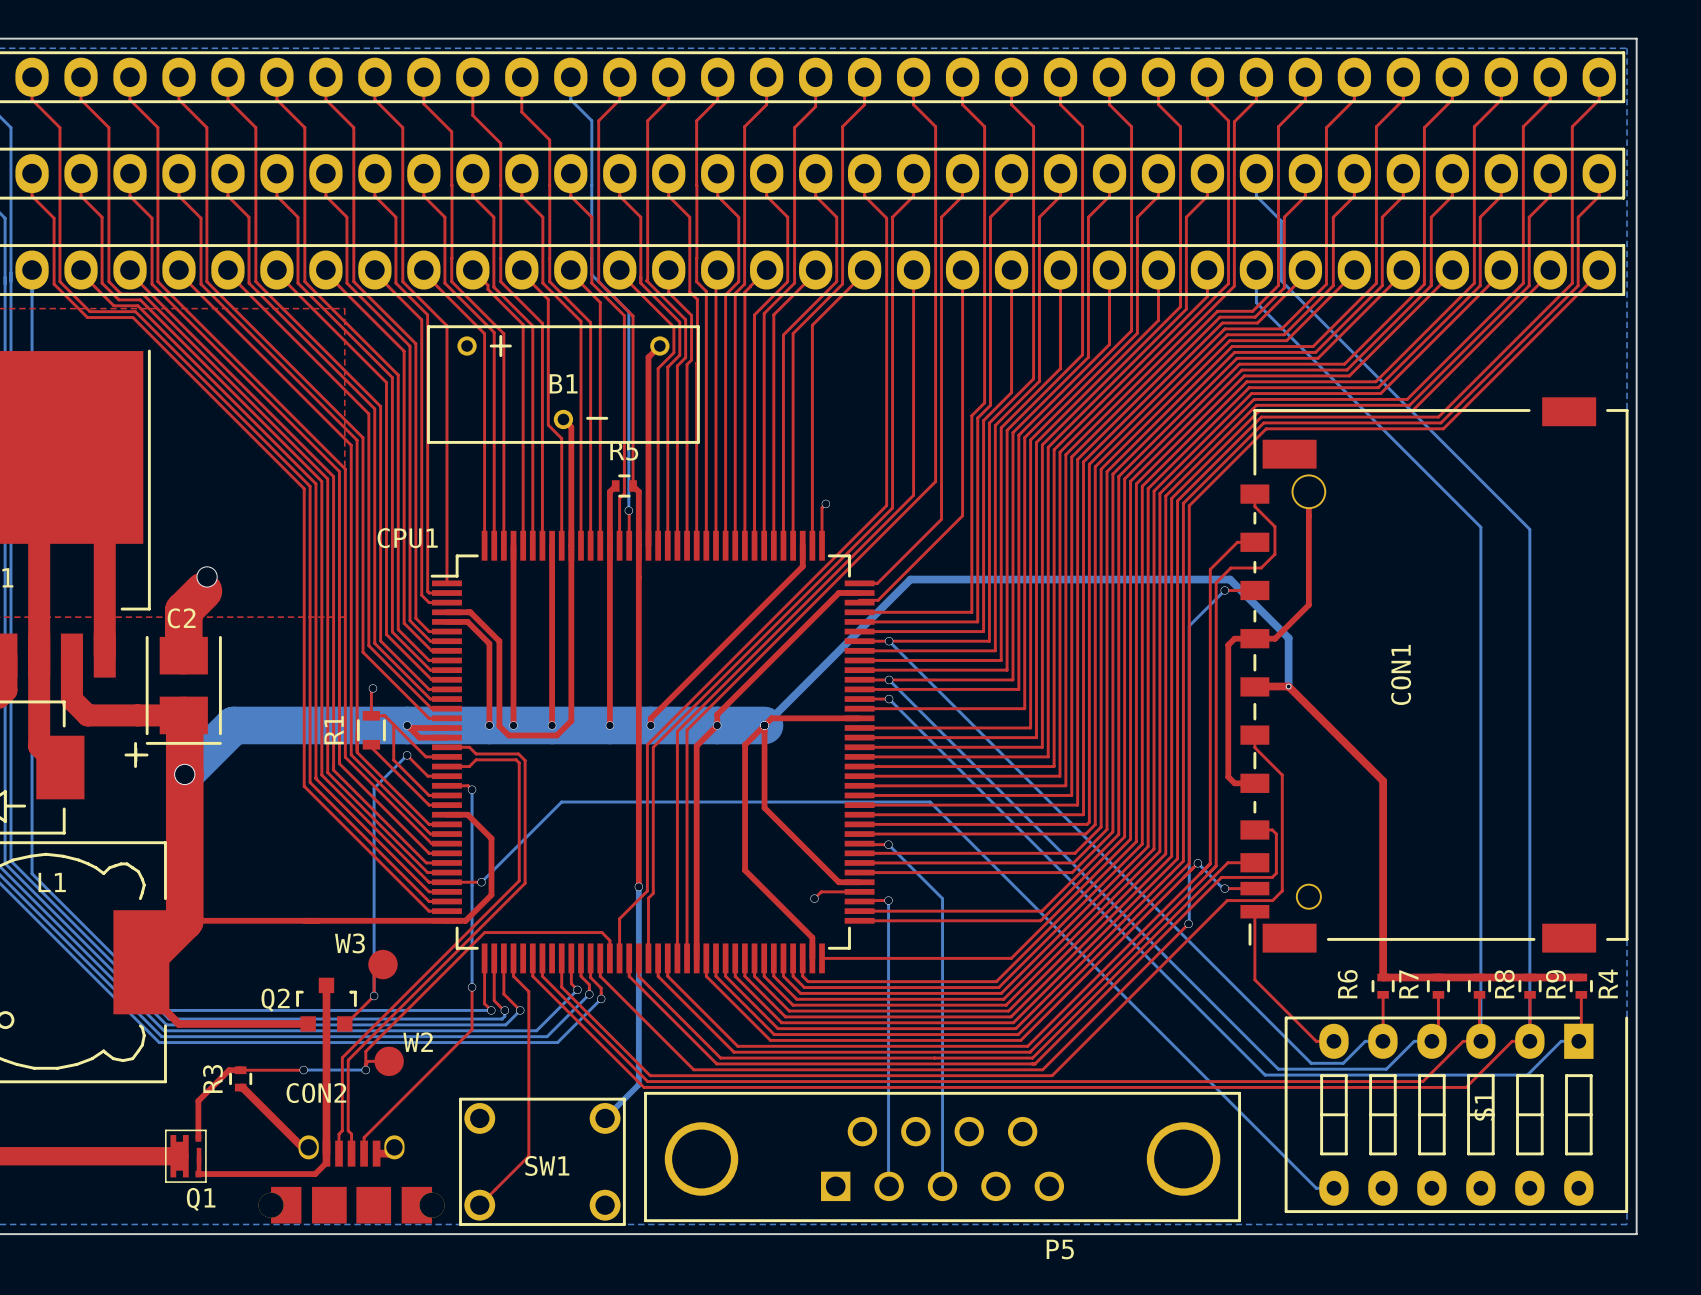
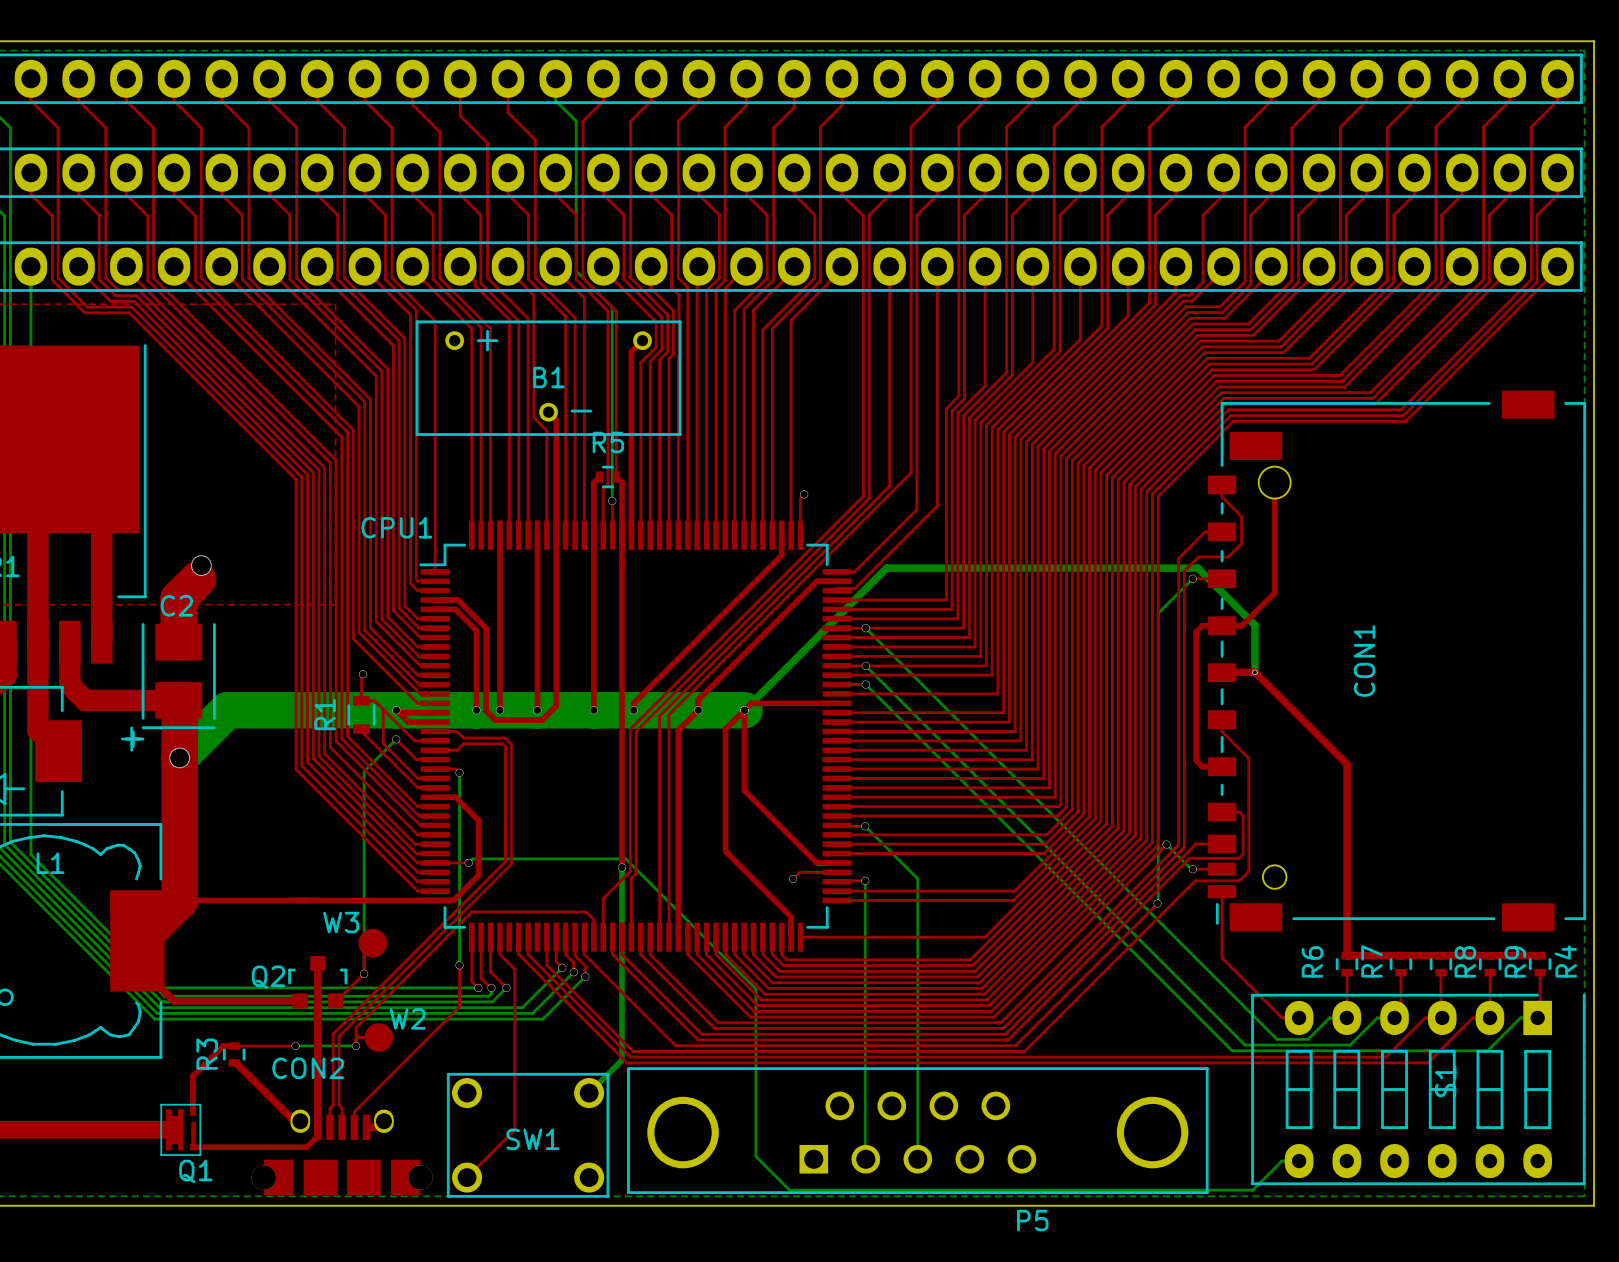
top track: (913, 77) (913, 104) (935, 126) -> none
top track: (1256, 77) (1256, 99) (1234, 121) (1234, 286) (1215, 305) -> (1223, 269) (1192, 301) (1183, 301)
top track: (962, 99) (962, 104) (984, 126) -> (937, 100) (911, 126)
top track: (1011, 99) (1011, 104) (1033, 126) -> (1032, 100) (1006, 126)
top track: none -> (985, 100) (958, 126)
top track: (1060, 99) (1060, 104) (1082, 126) -> (1080, 100) (1054, 126)
top track: (1109, 99) (1109, 104) (1131, 126) -> (1128, 100) (1101, 126)
top track: (1158, 99) (1158, 104) (1180, 126) -> (1175, 100) (1149, 126)
top track: (1207, 99) (1228, 120) (1228, 283) (1212, 299) -> (1223, 172) (1223, 194) (1203, 215) (1203, 281) (1189, 295) (1180, 295)
bottom track: (1256, 173) (1256, 196) (1281, 221) (1281, 280) (1529, 529) (1529, 1041) -> none
bottom track: (1256, 270) (1256, 302) (1480, 527) (1480, 1041) -> none
bottom track: (485, 878) (561, 802) (930, 802) (1316, 1188) -> (472, 858) (625, 858) (755, 989) (755, 1156) (789, 1190) (1252, 1190) (1281, 1161)

